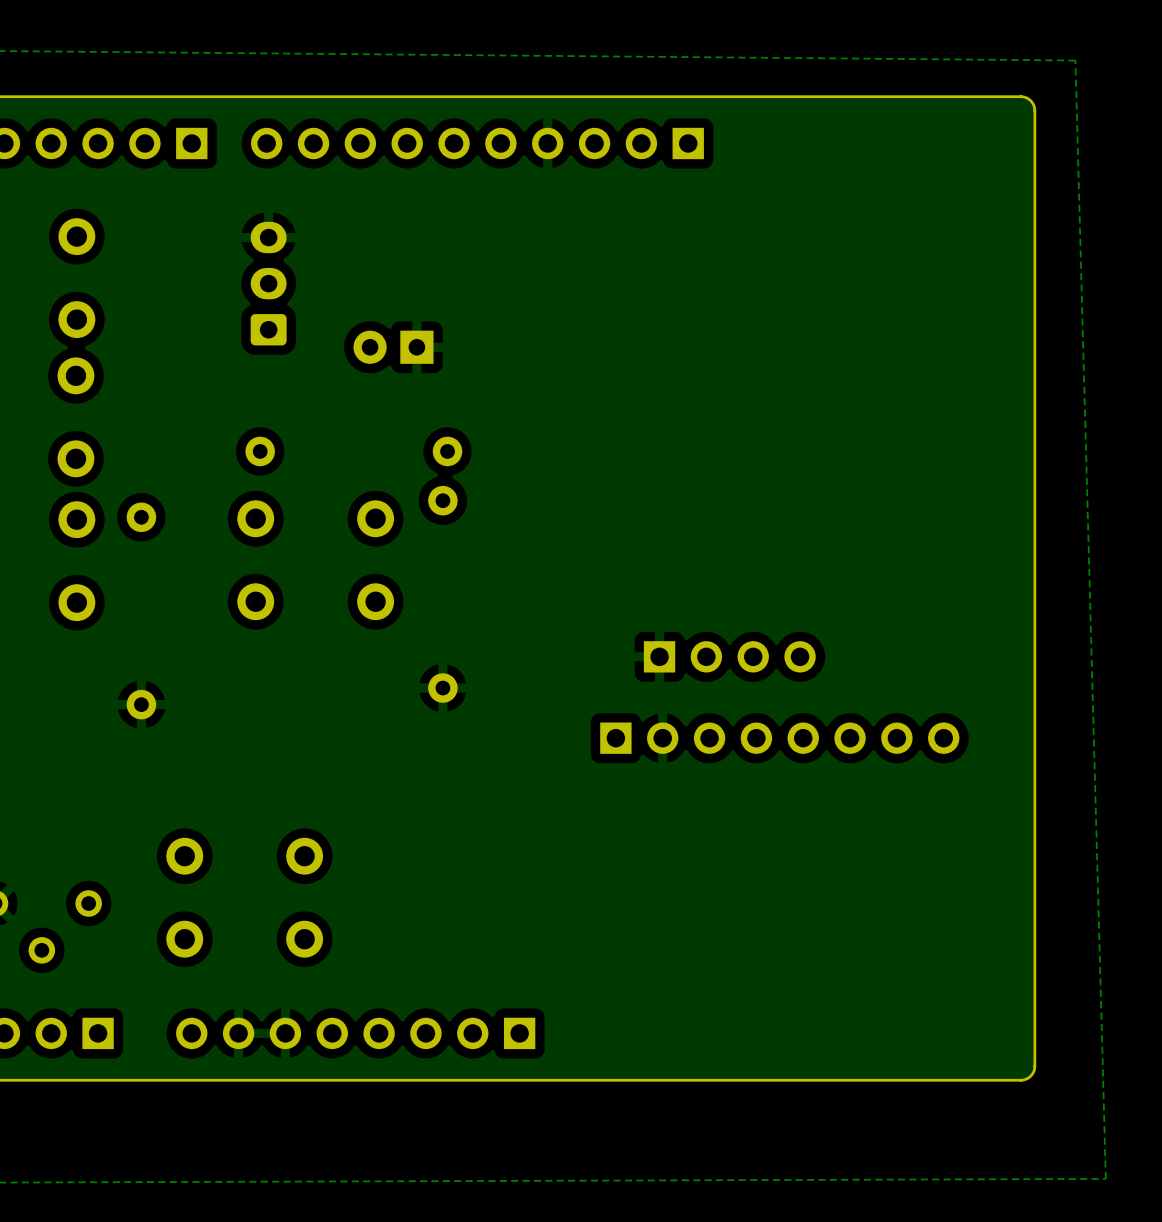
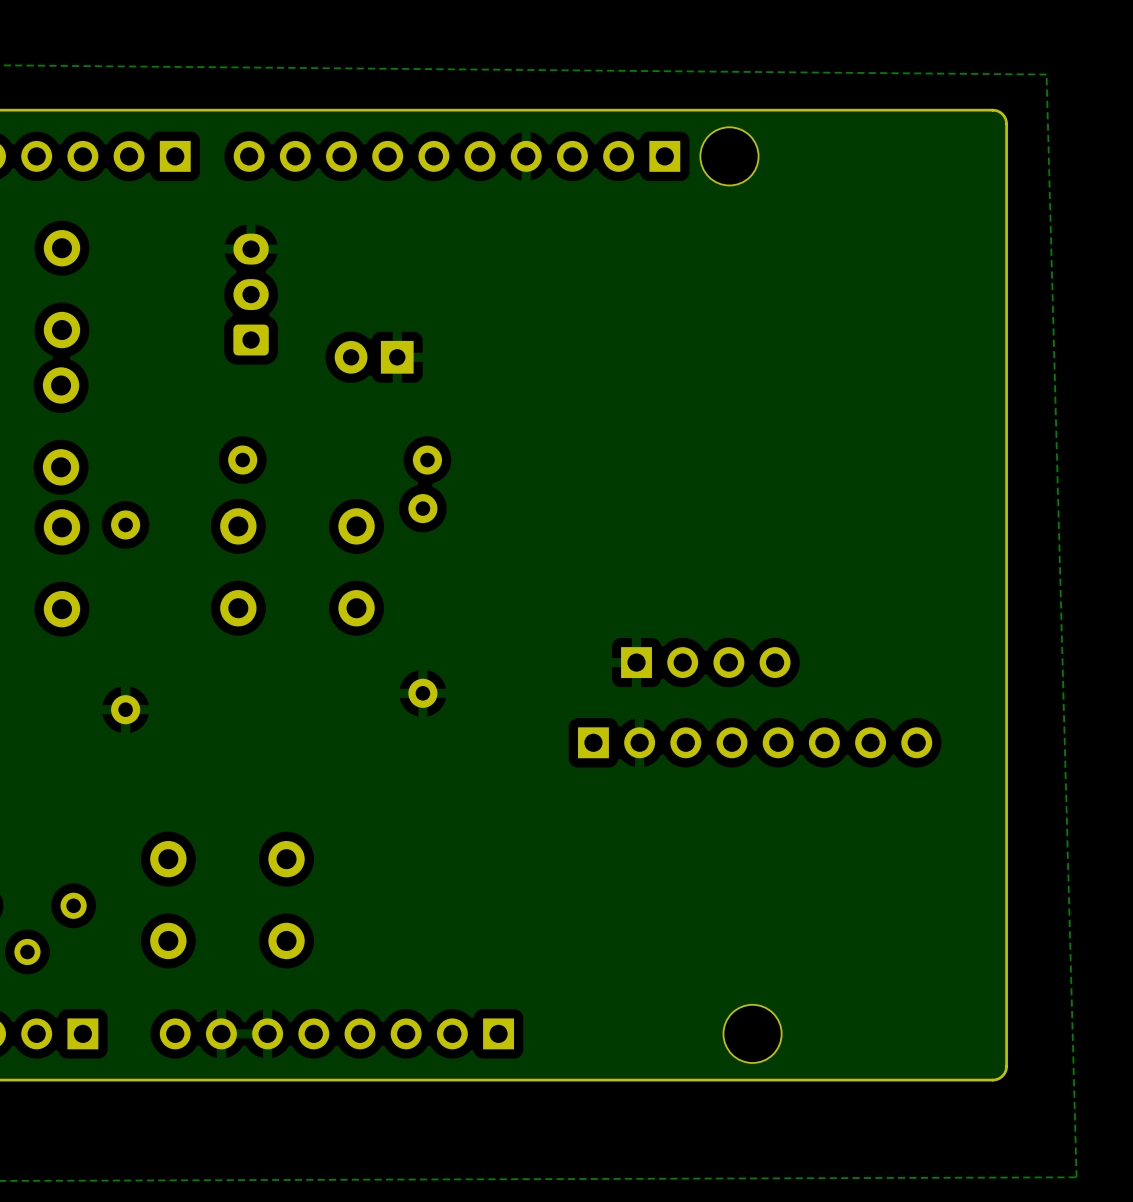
part: none -> (729, 156)
part: none -> (752, 1033)

